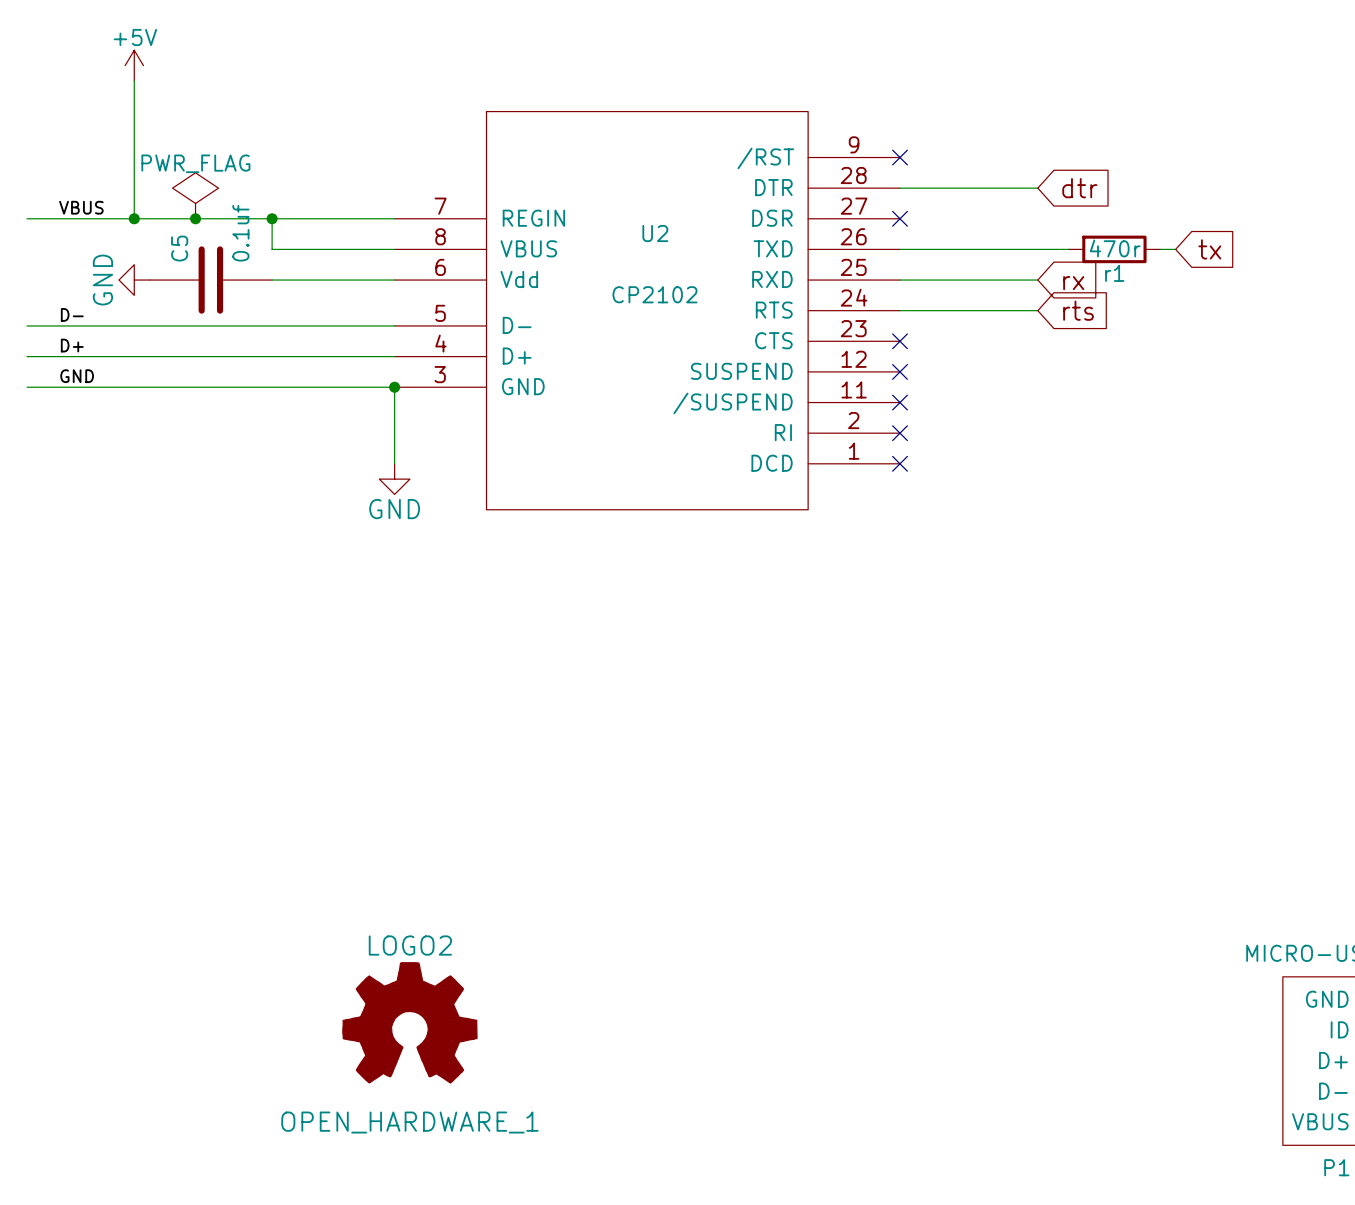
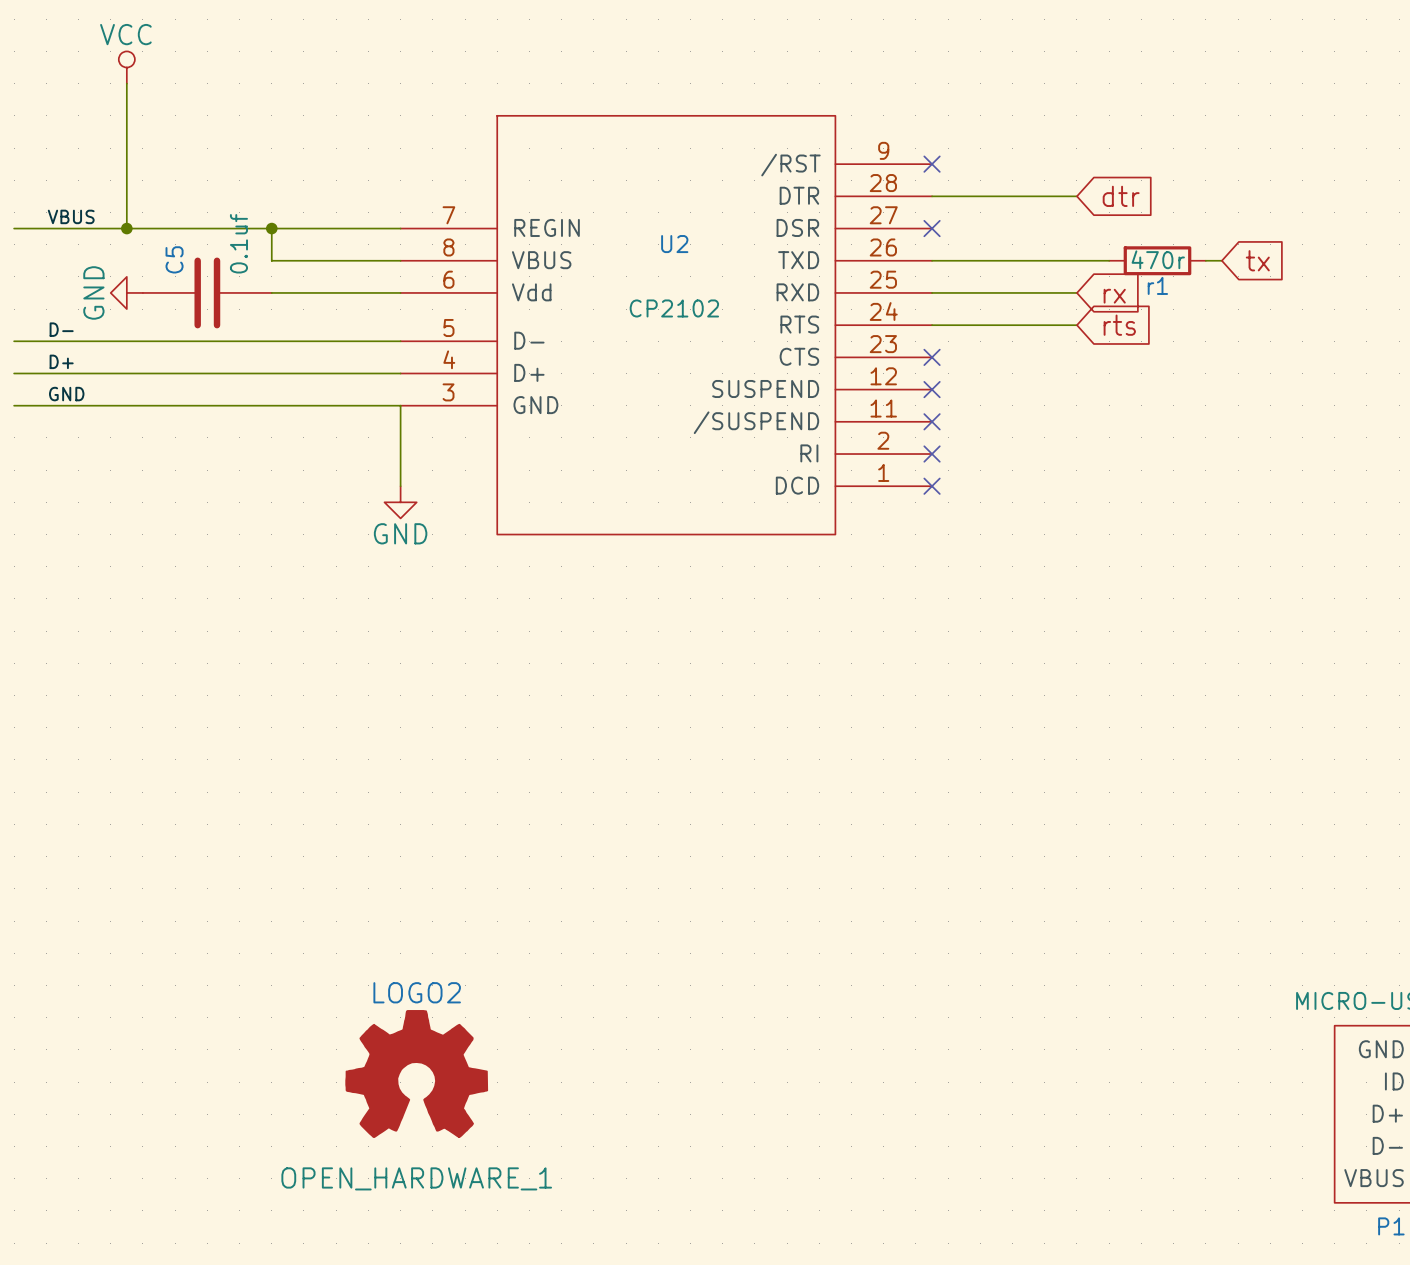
power symbol: +5V (134, 65) -> VCC (126, 67)
power symbol: PWR_FLAG (195, 195) -> none
junction: (195, 218) -> none
junction: (394, 387) -> none

